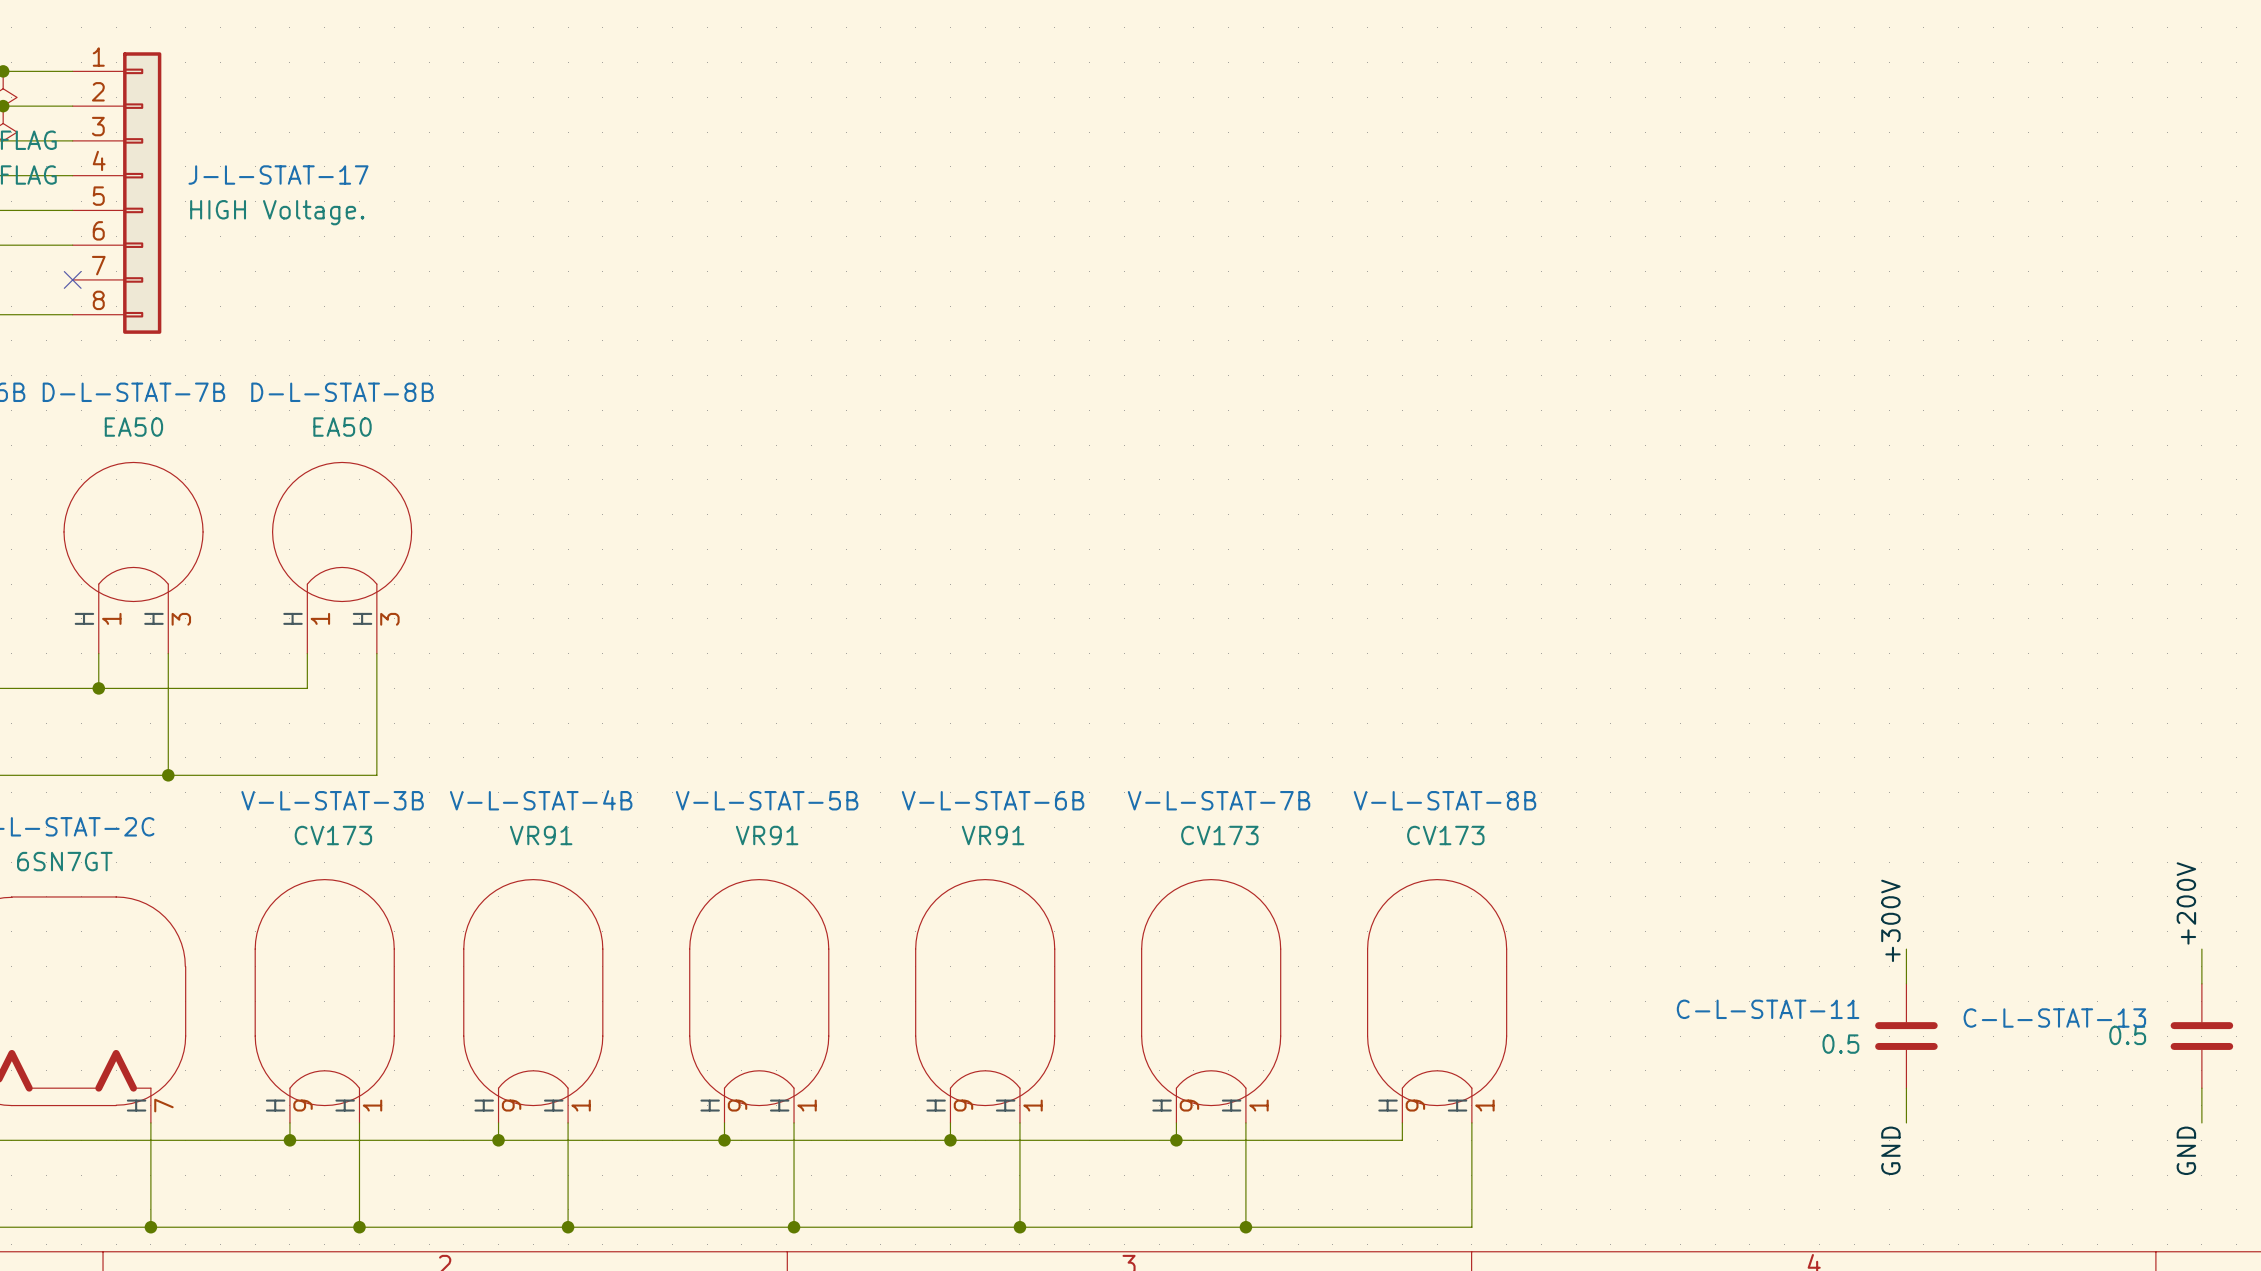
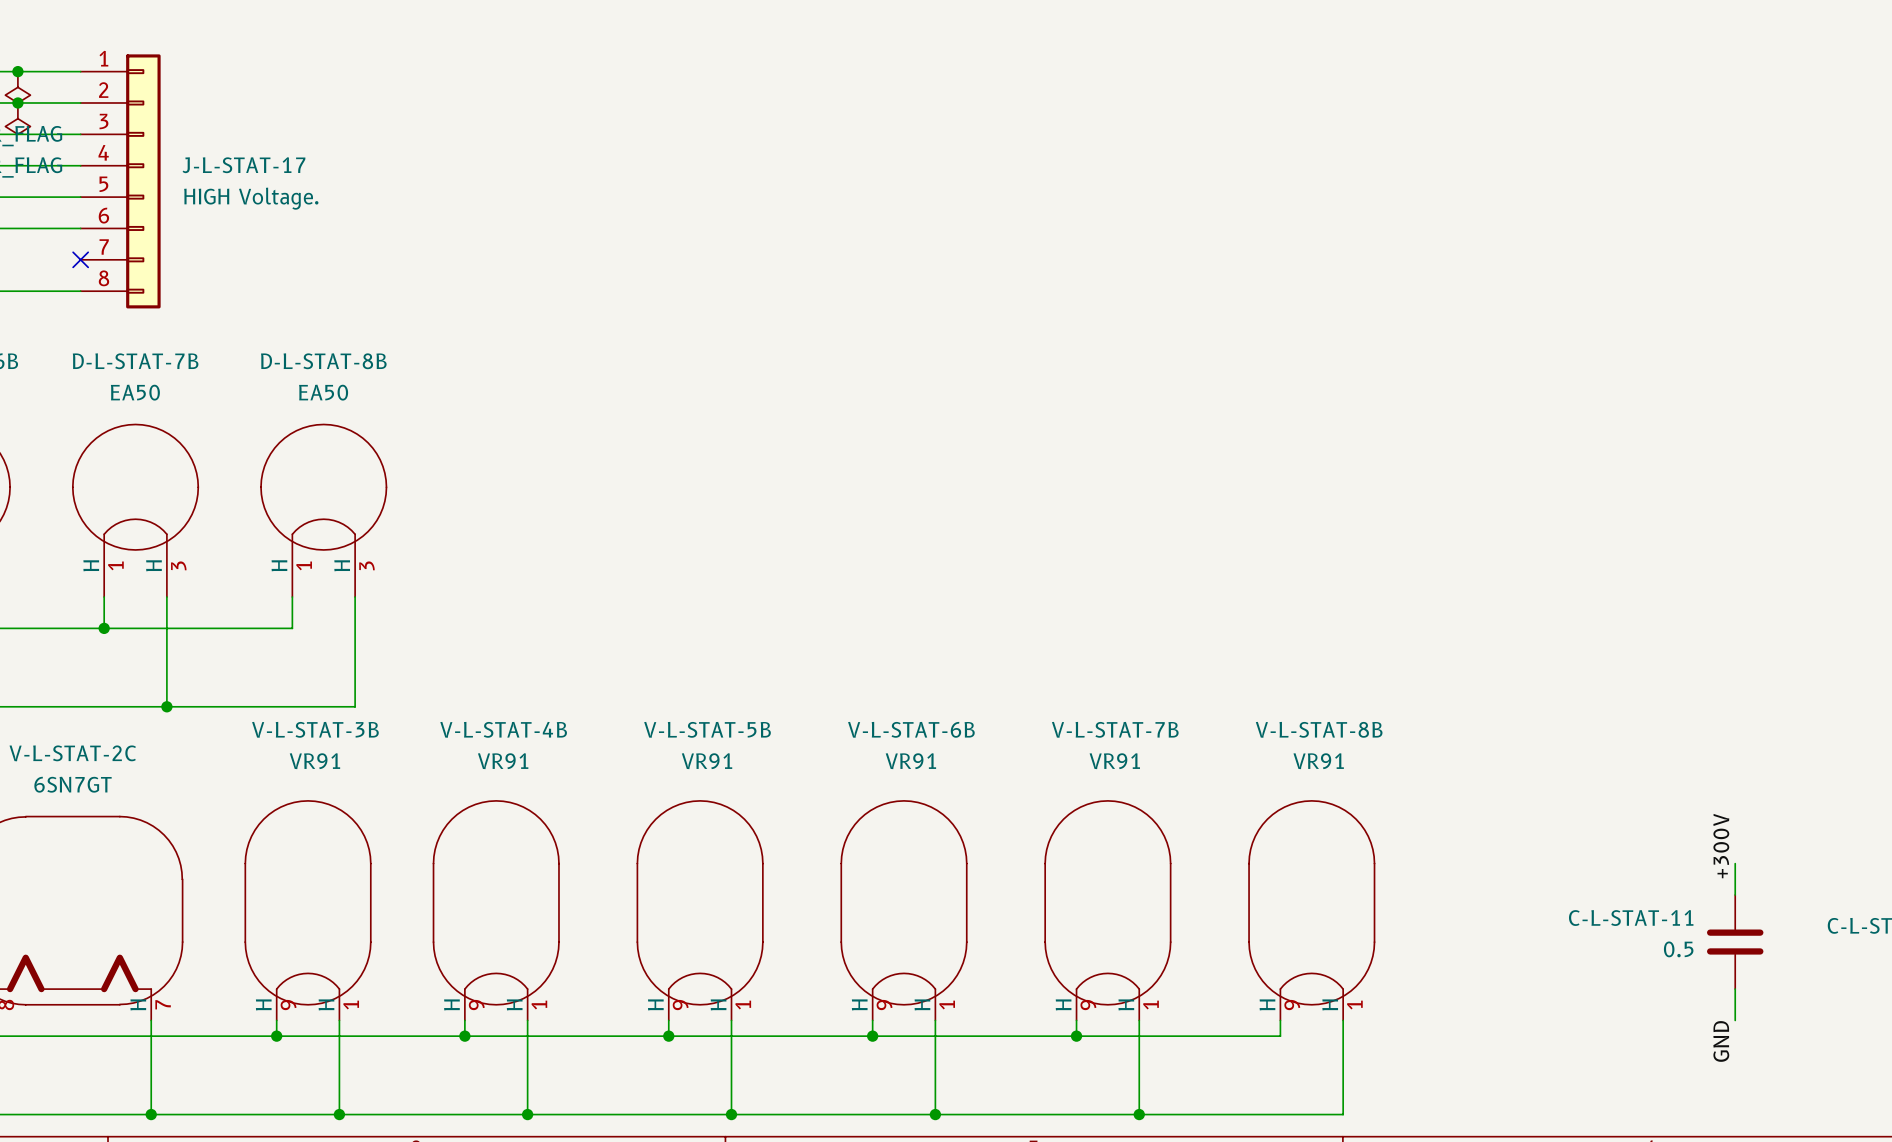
V-L-STAT-3B value: CV173 (333, 835) -> VR91 (314, 761)
V-L-STAT-7B value: CV173 (1219, 835) -> VR91 (1114, 761)
V-L-STAT-8B value: CV173 (1445, 835) -> VR91 (1318, 761)

